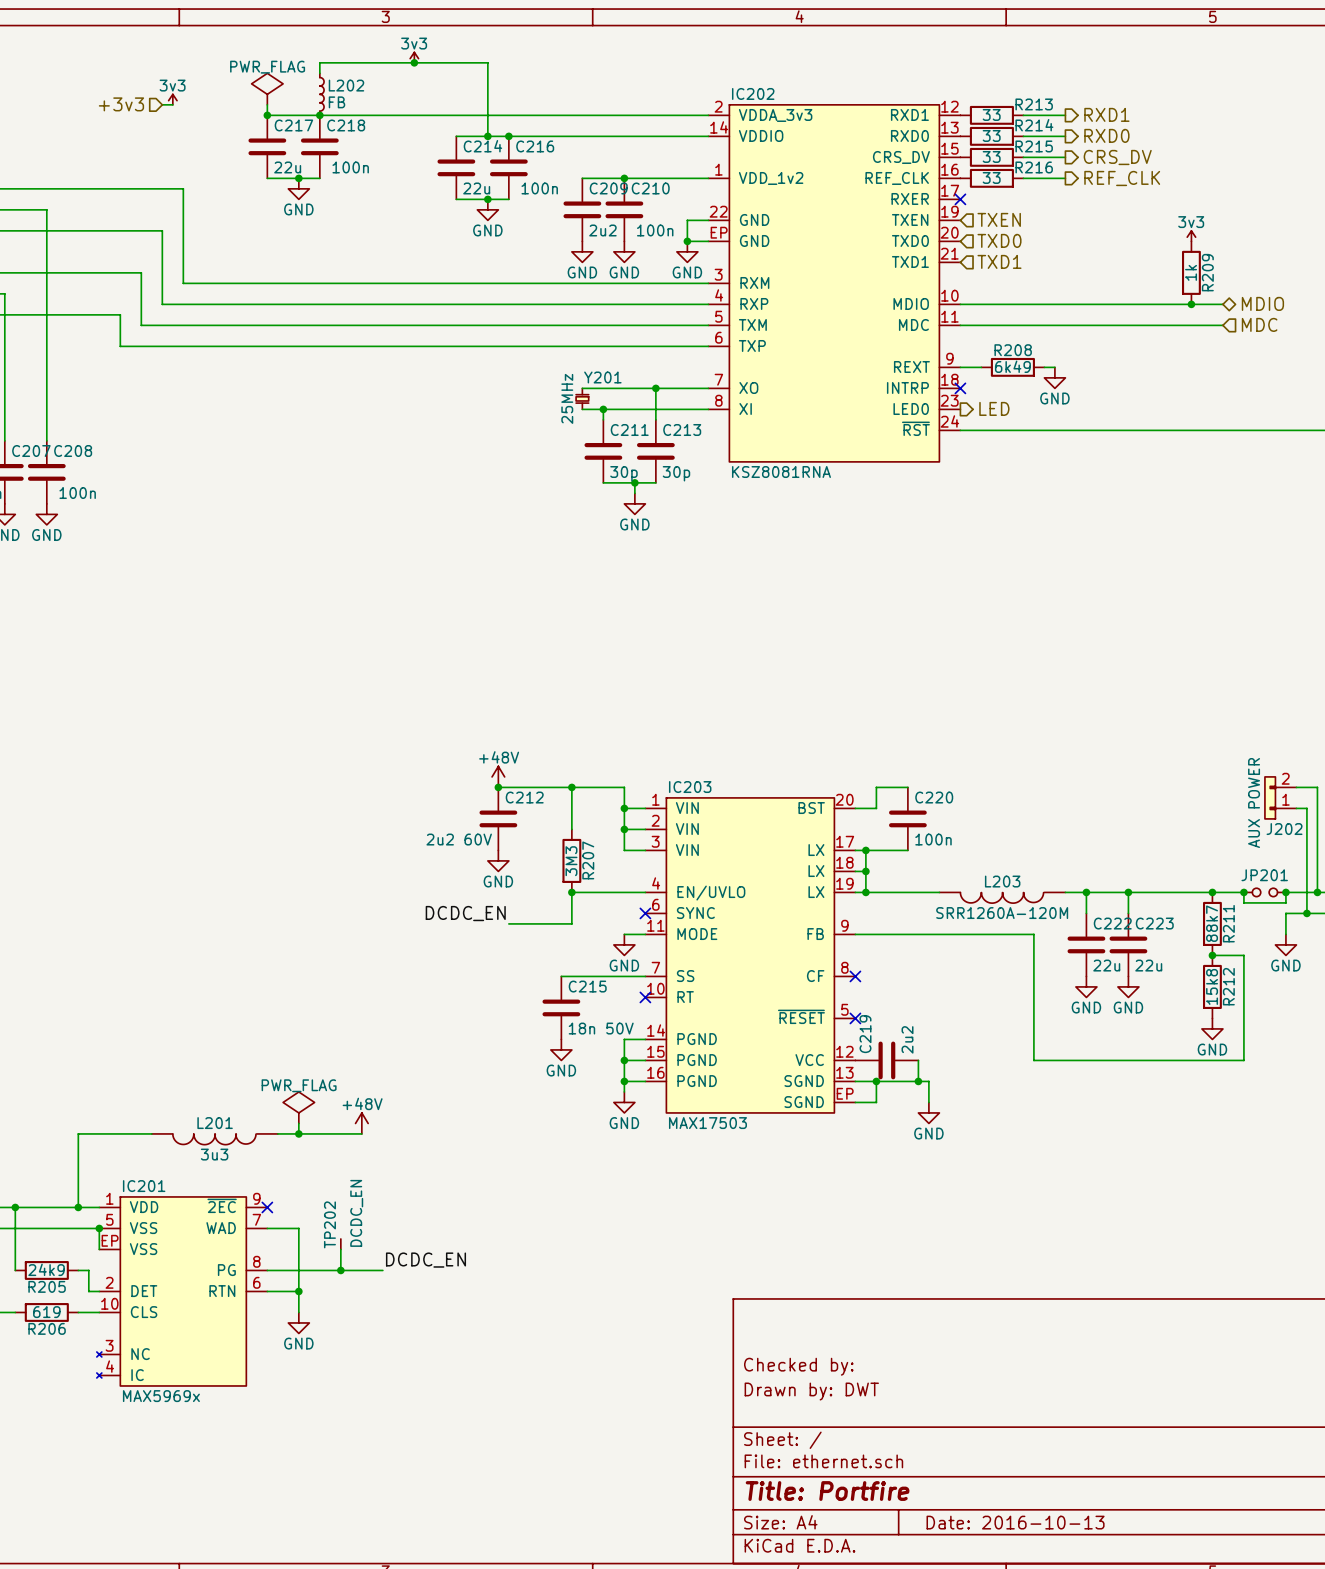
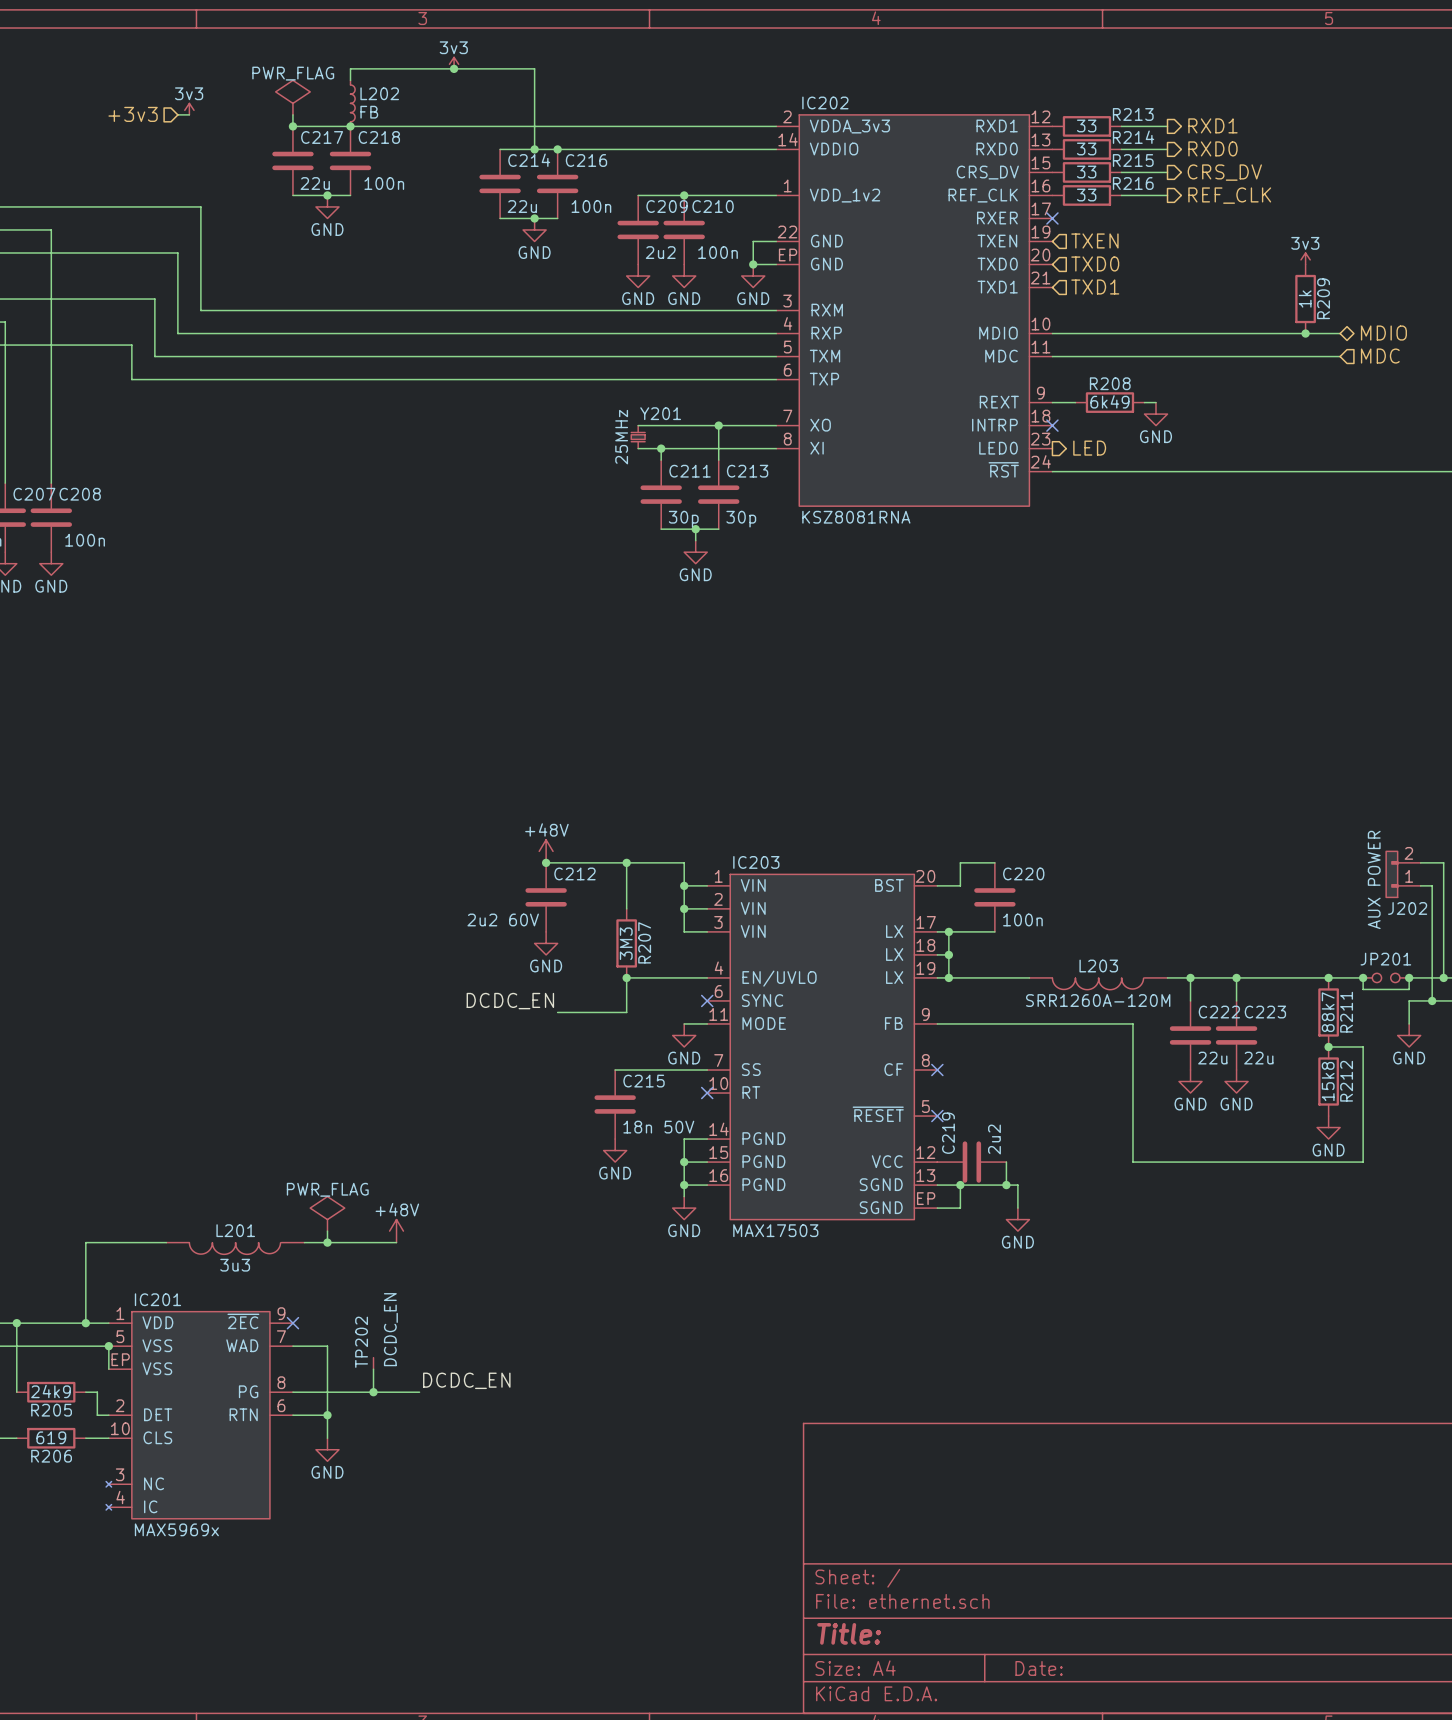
title block: Checked by: (798, 1366) -> none
title block: Drawn by: DWT (811, 1391) -> none
title block: Title: Portfire (827, 1491) -> Title: (849, 1633)
title block: Date: 2016-10-13 (1015, 1522) -> Date: (1039, 1668)

